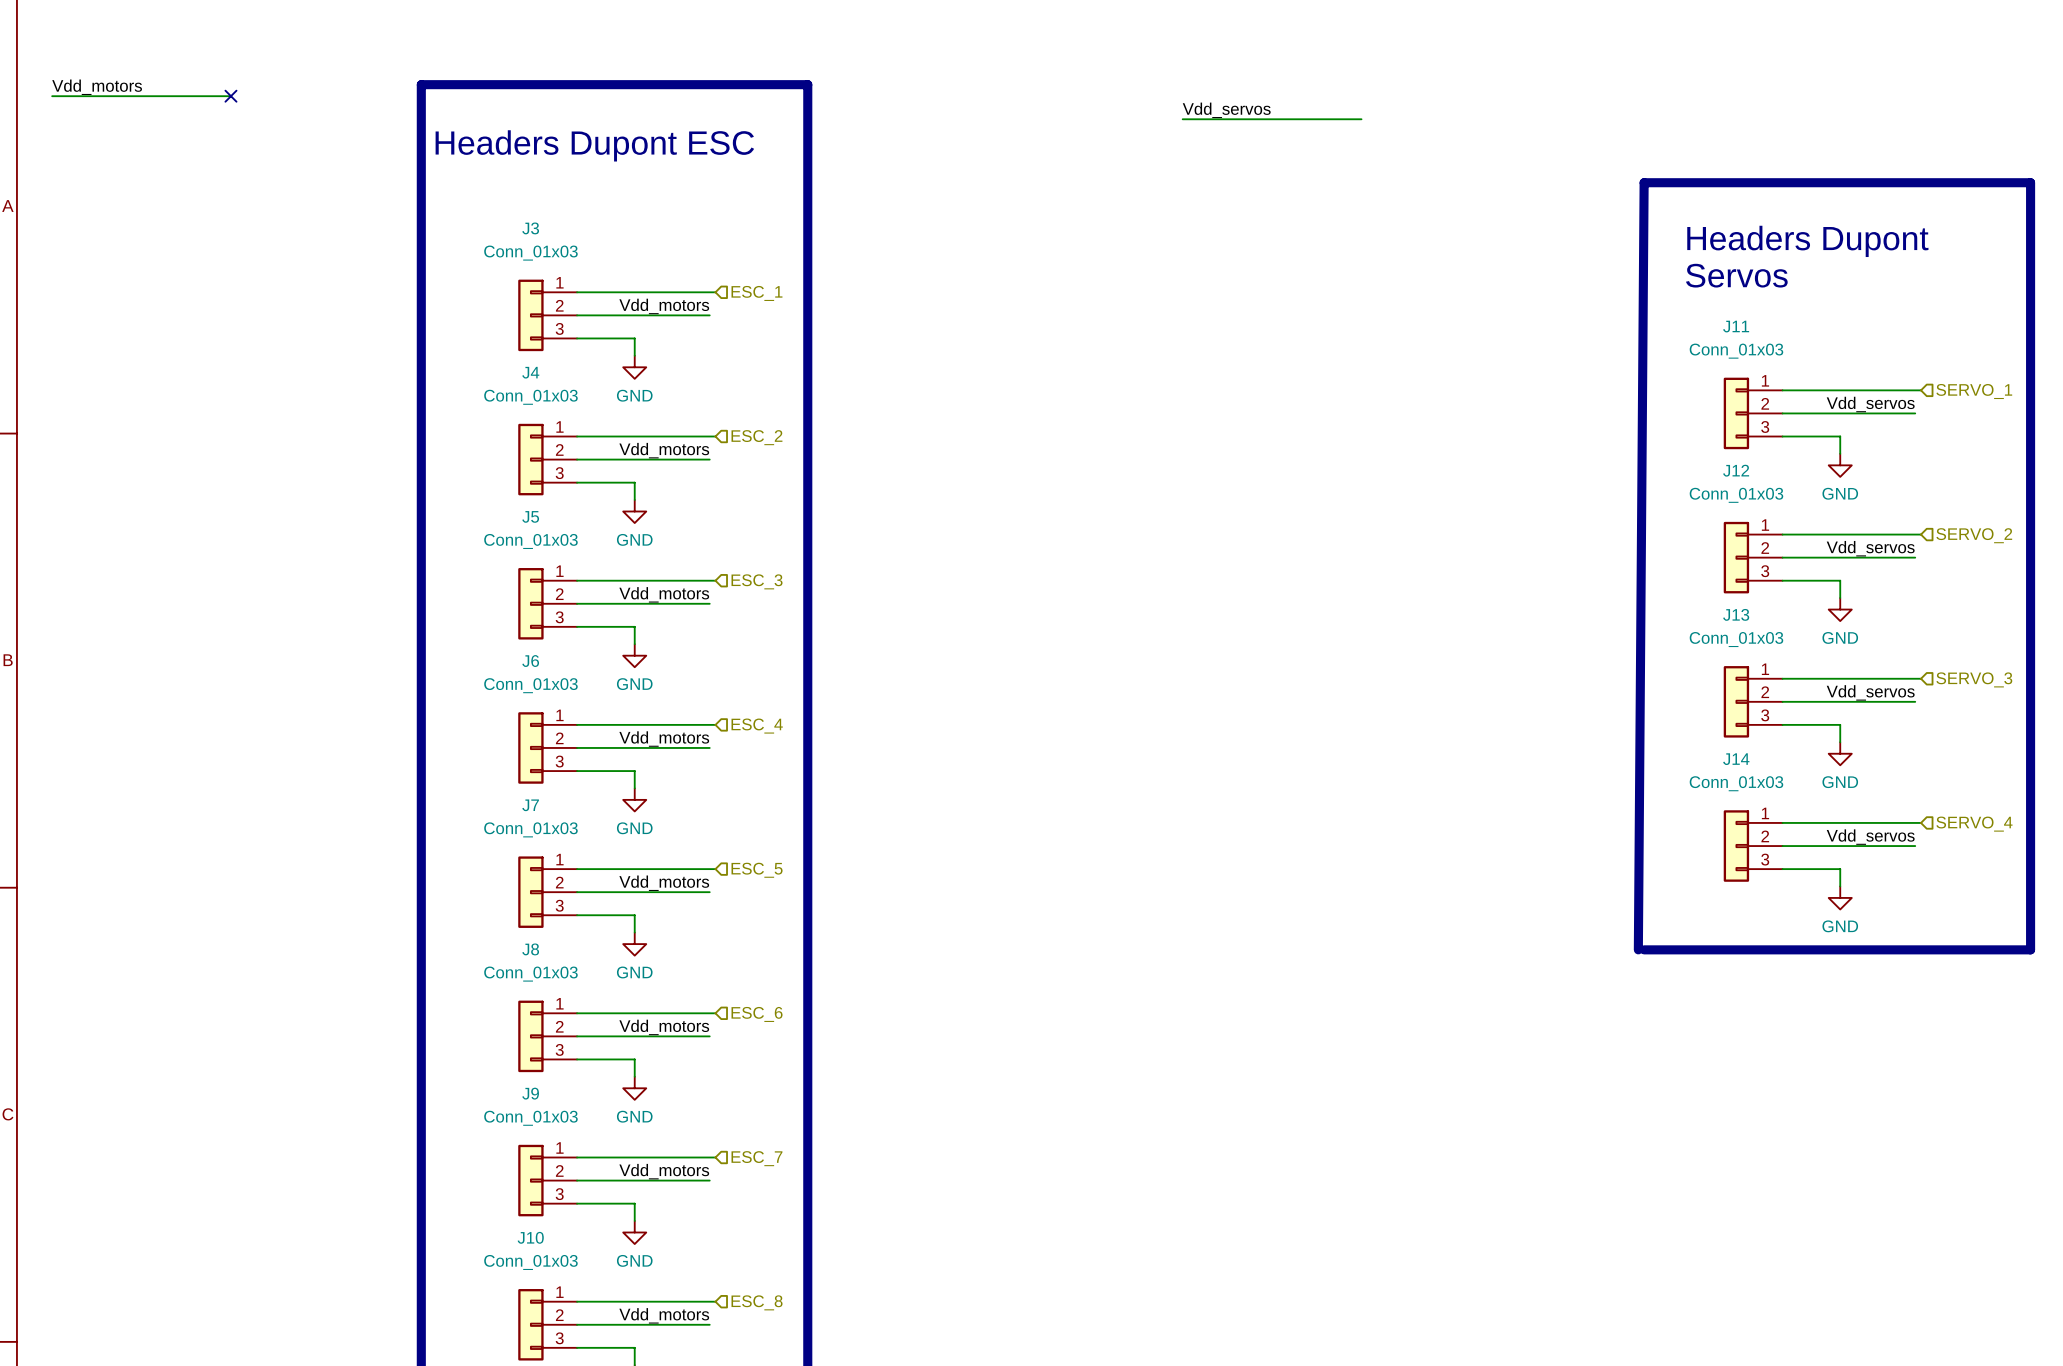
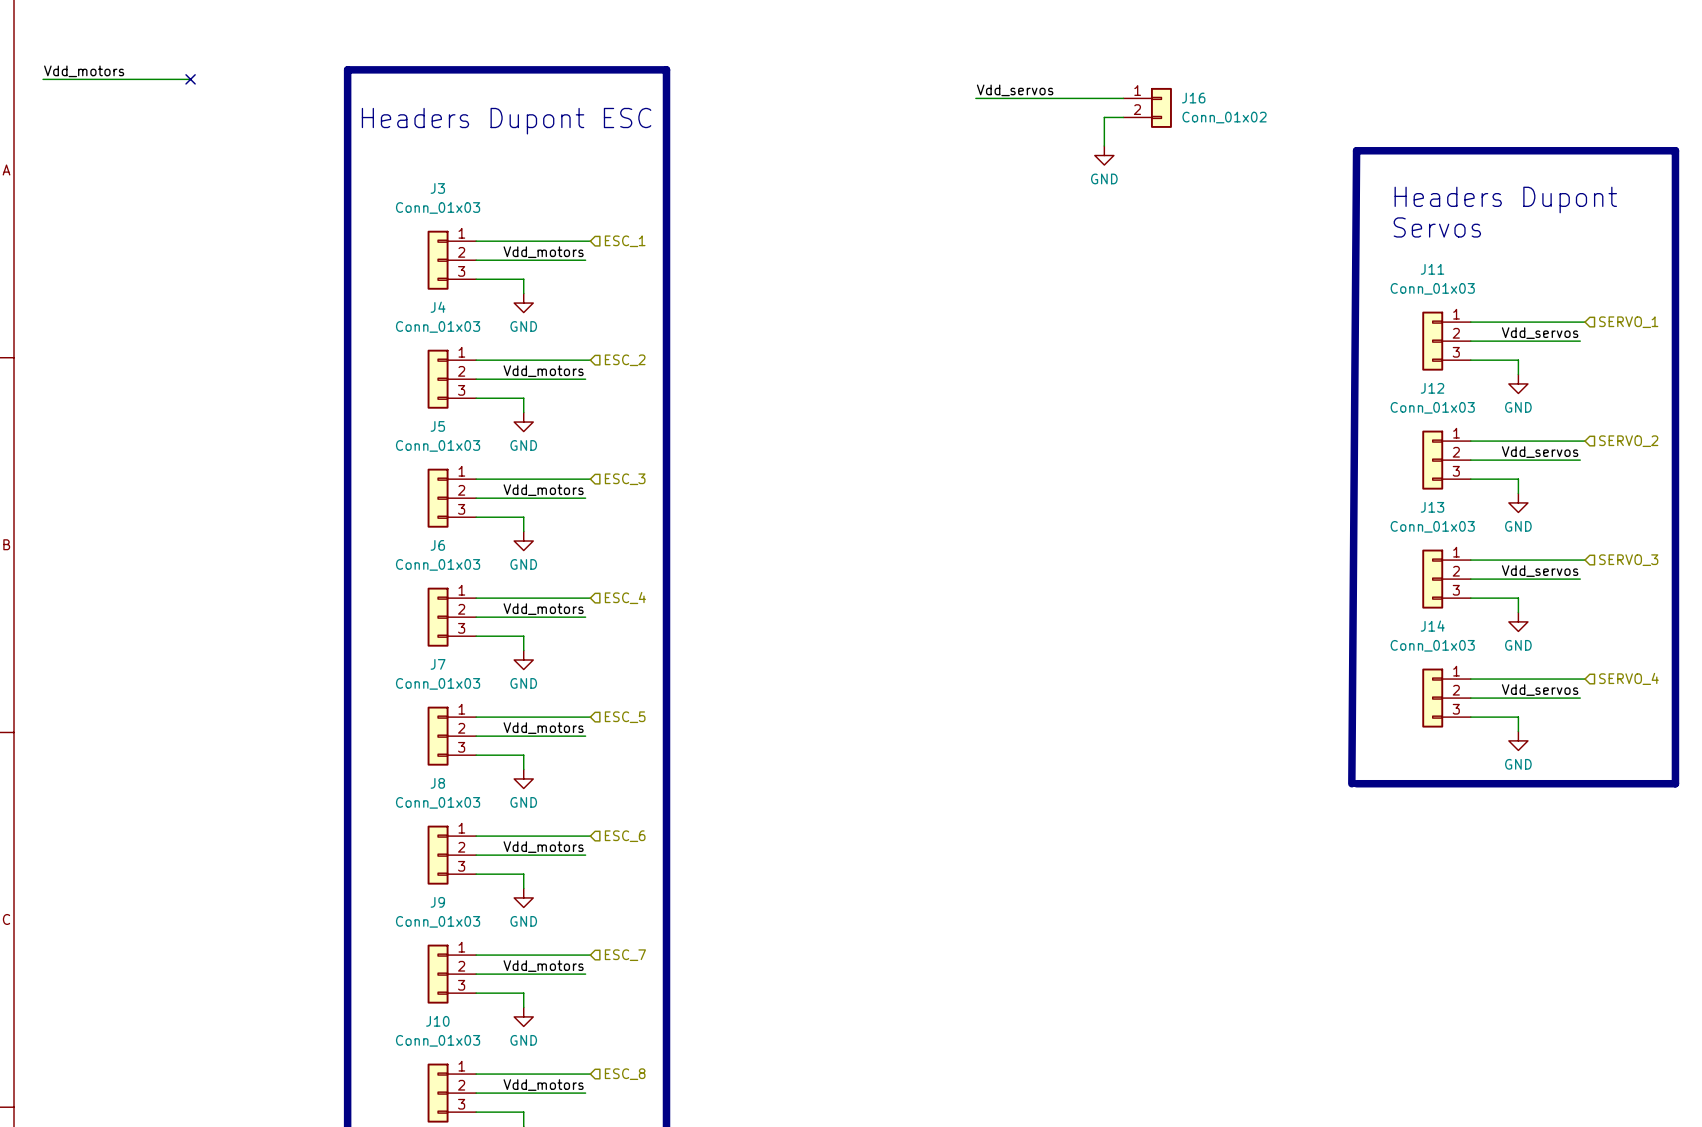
J16: none -> Conn_01x02 (1147, 107)
wire: none -> (1123, 117) (1104, 117) (1104, 146)
power symbol: none -> GND (1104, 155)

